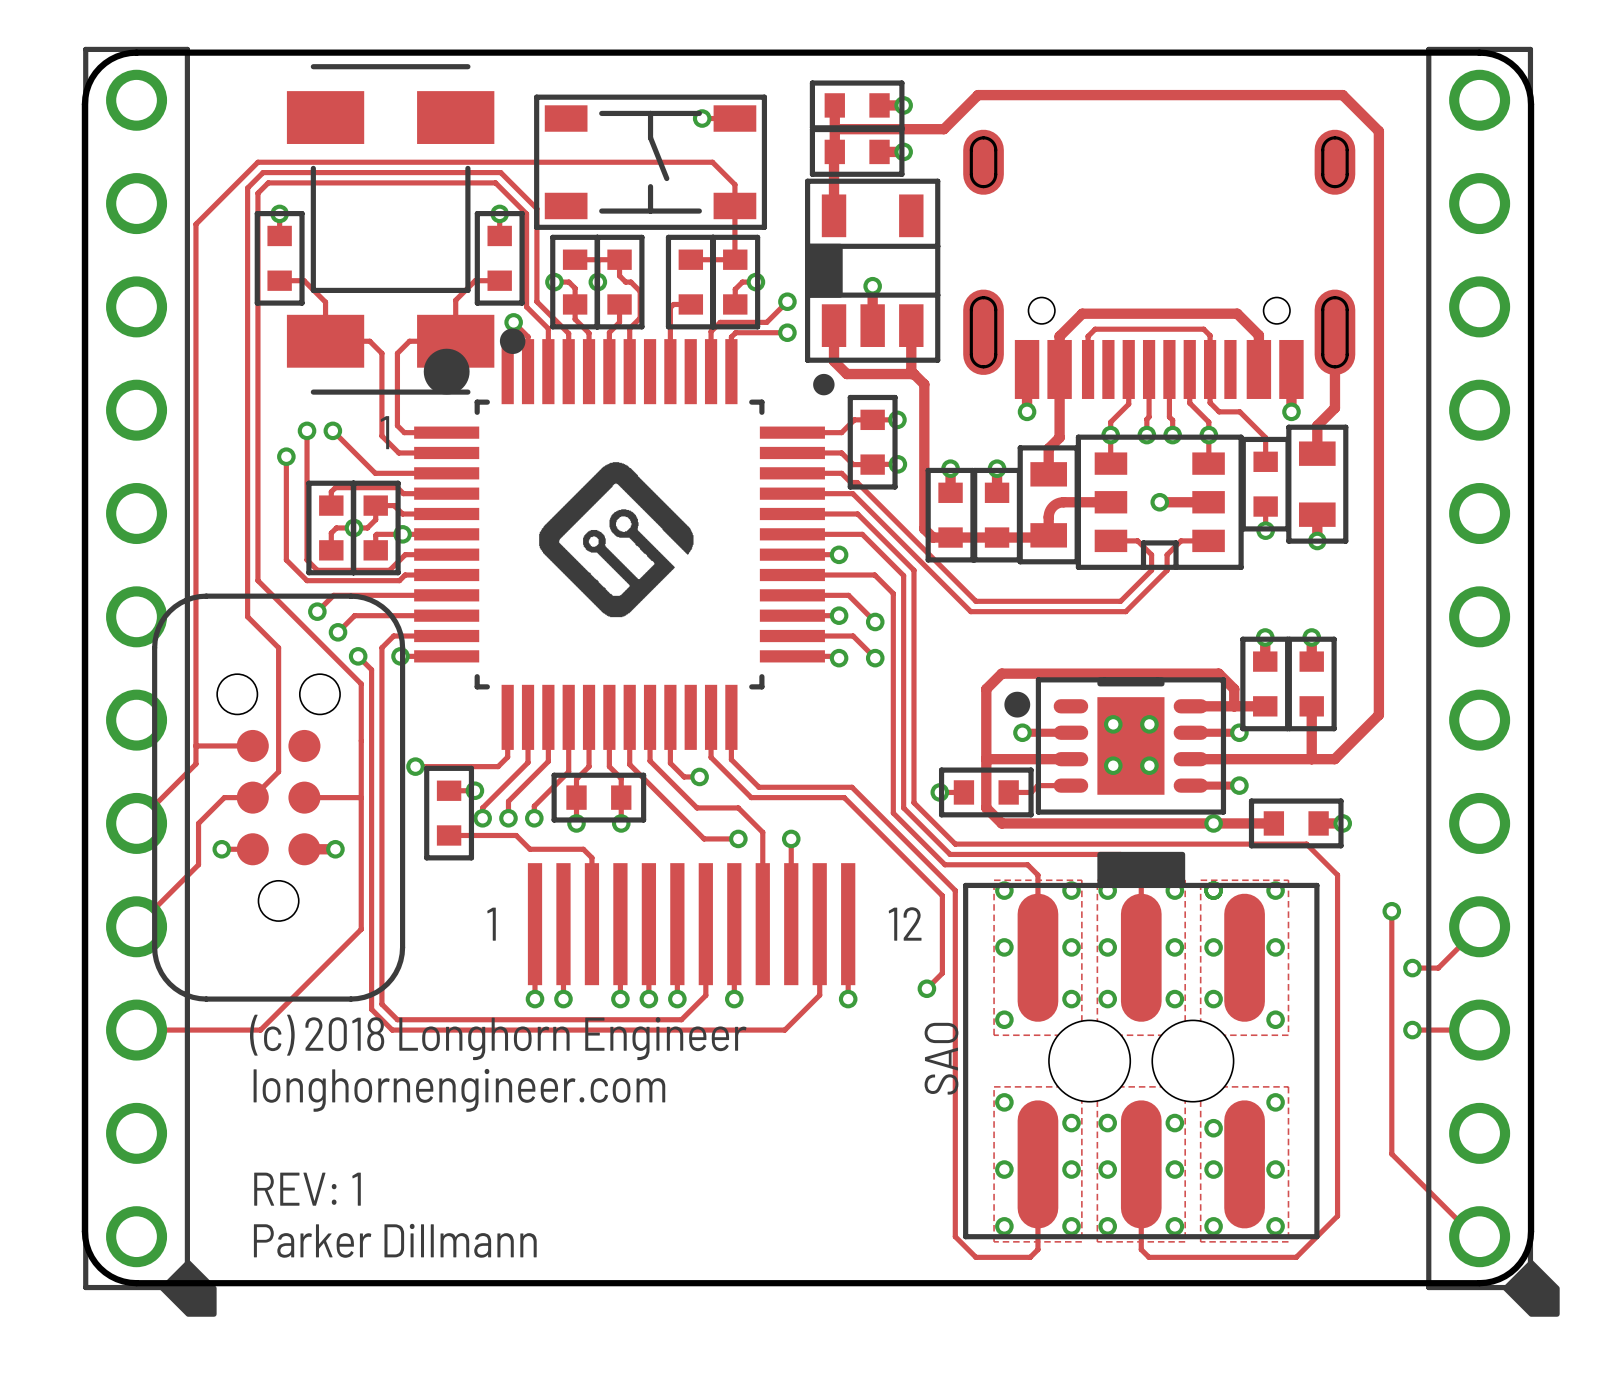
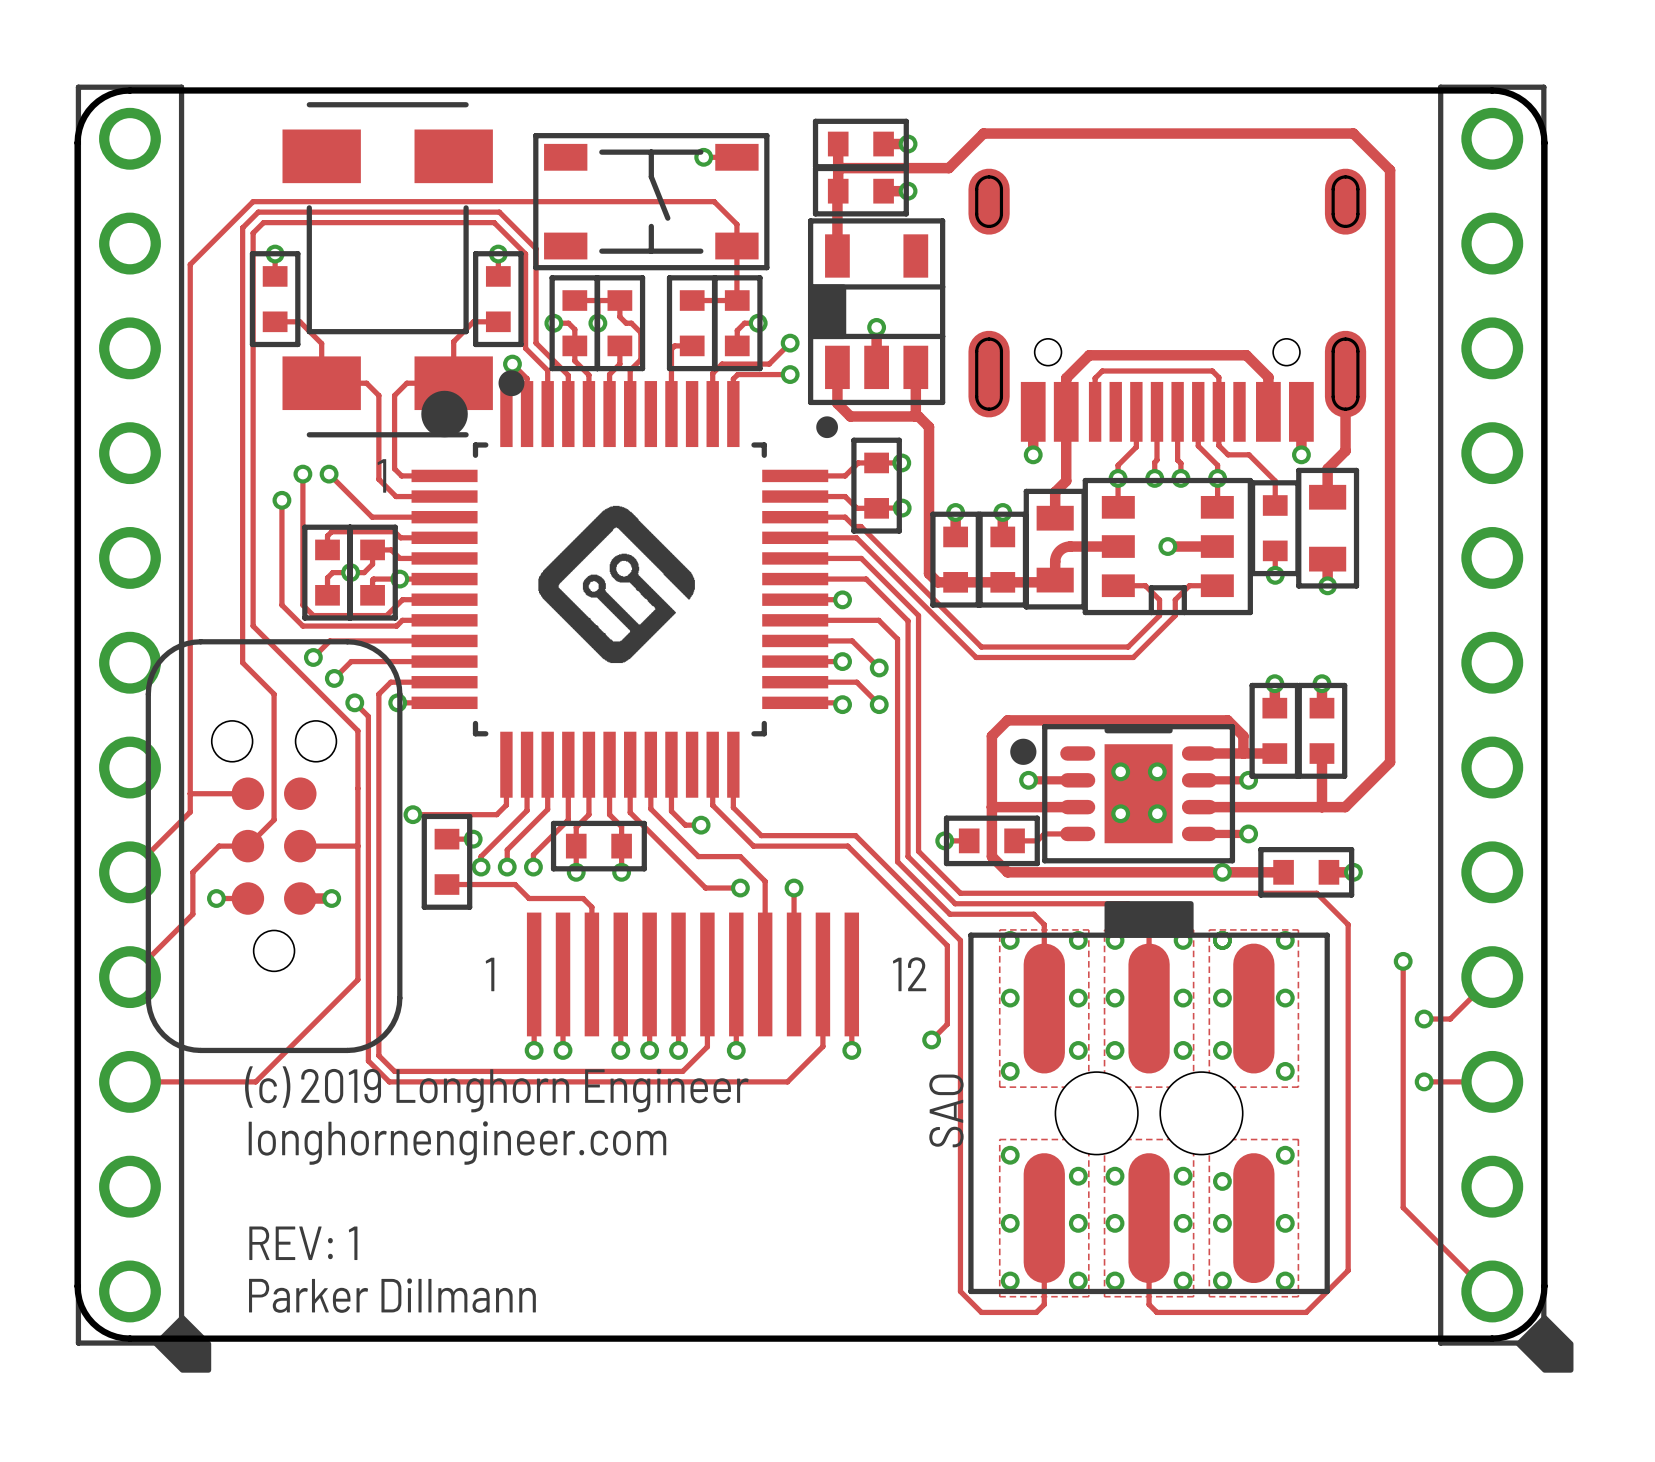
drawing shape: [249, 1014, 747, 1258] -> [245, 1066, 749, 1313]

